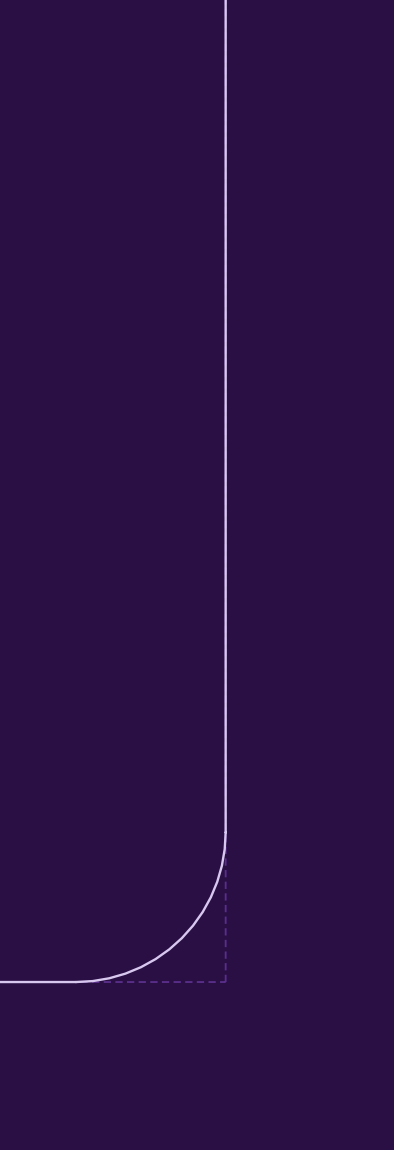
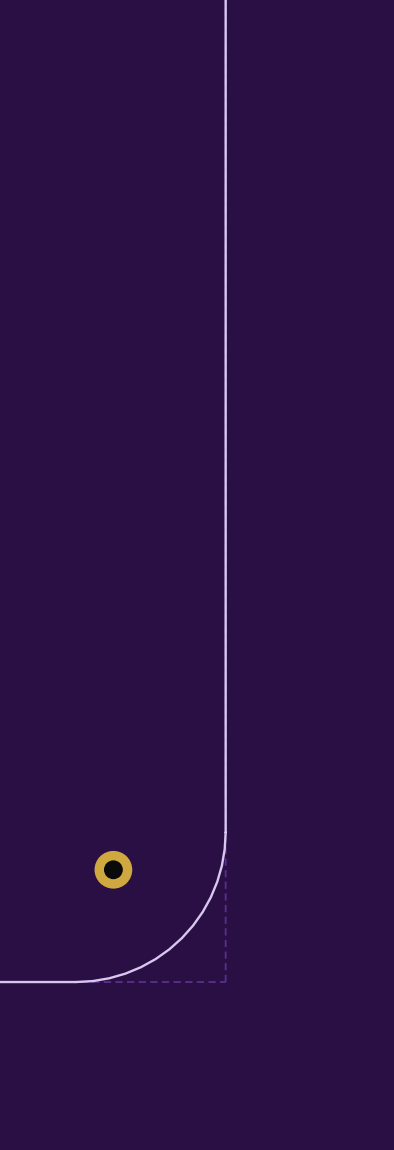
via: none -> (113, 869)

